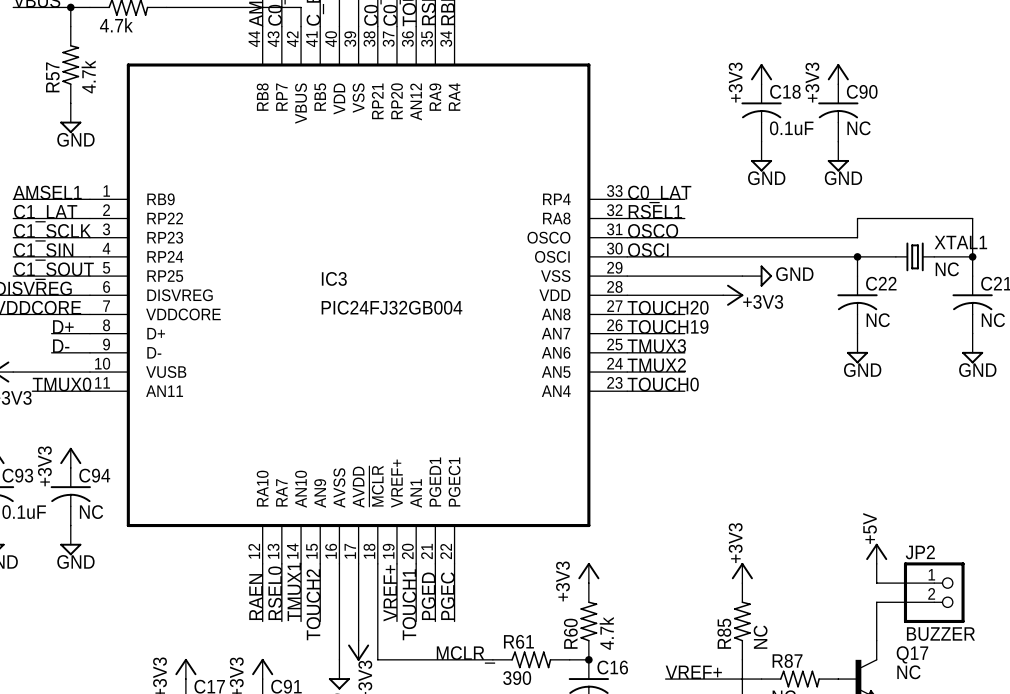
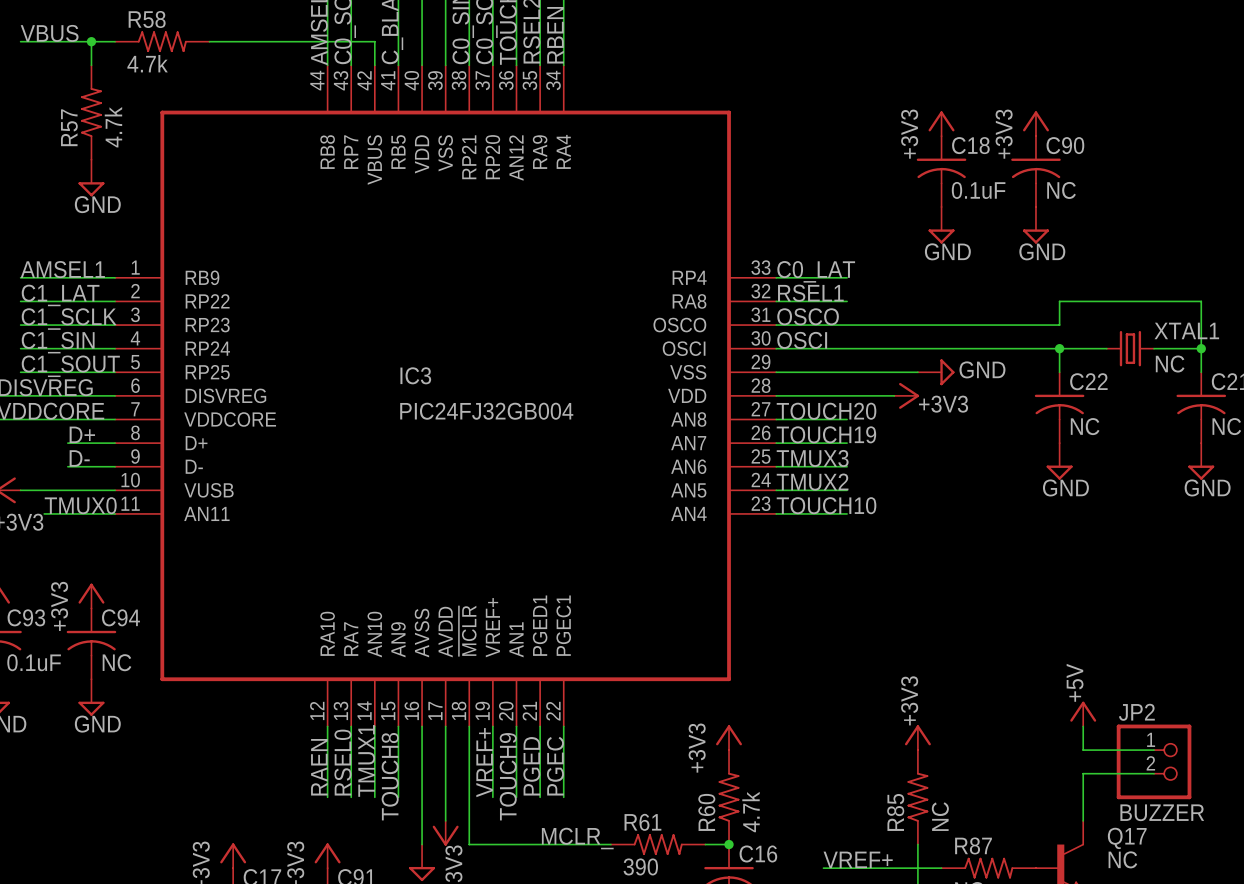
label: TOUCH0 (663, 384) -> TOUCH10 (826, 505)
label: TOUCH2 (313, 604) -> TOUCH8 (390, 776)
label: TOUCH1 (409, 604) -> TOUCH9 (508, 776)

